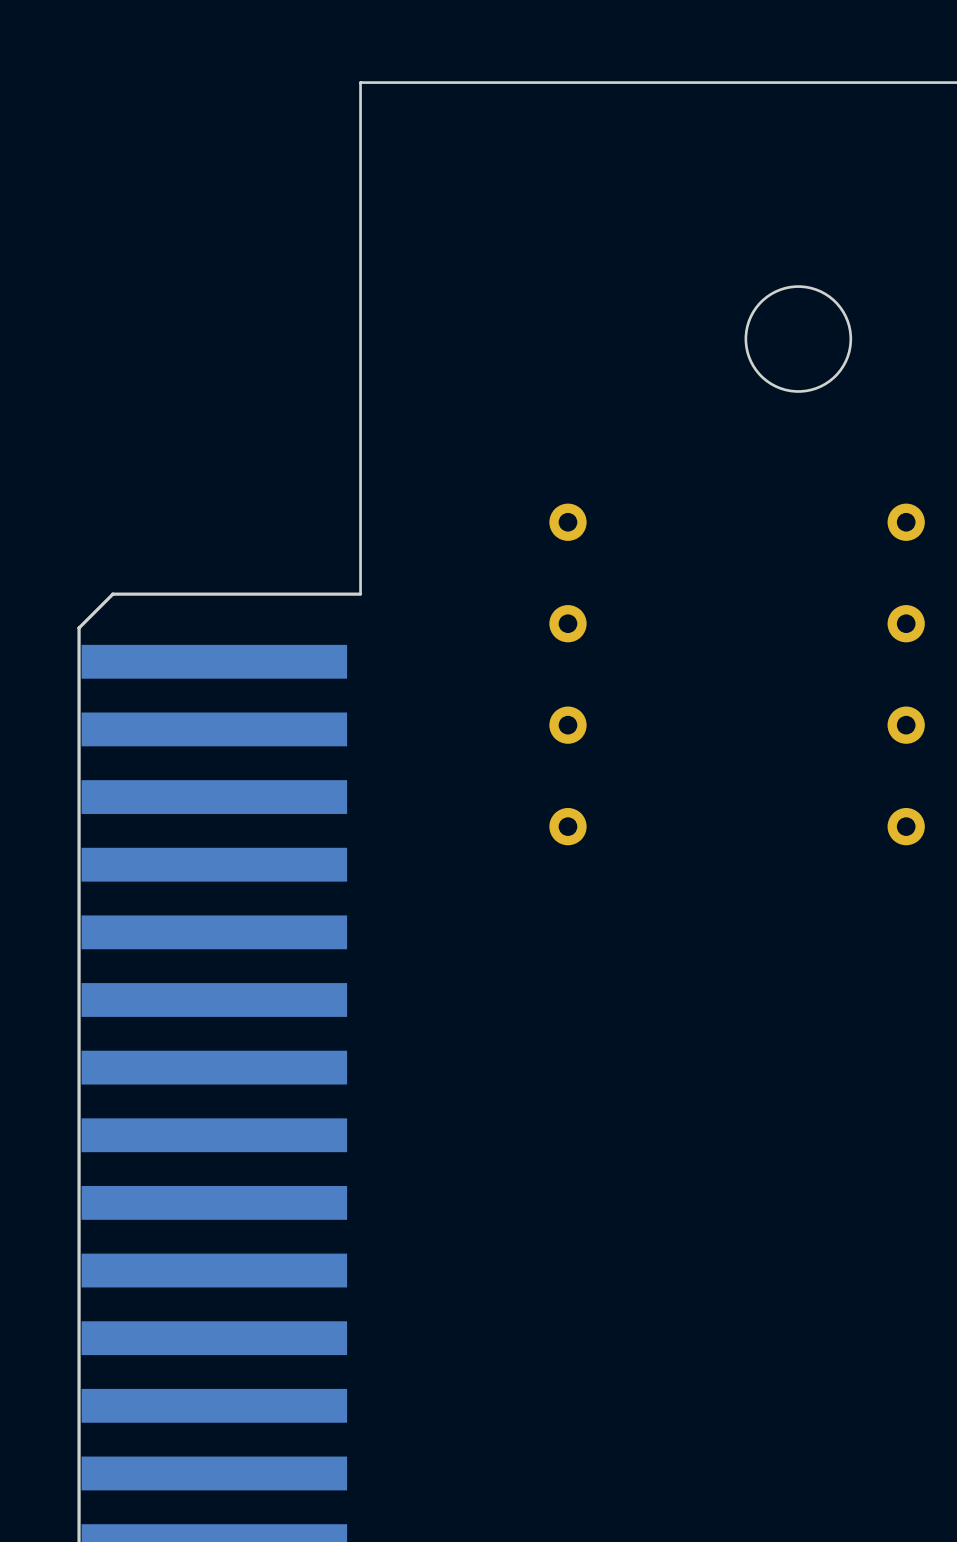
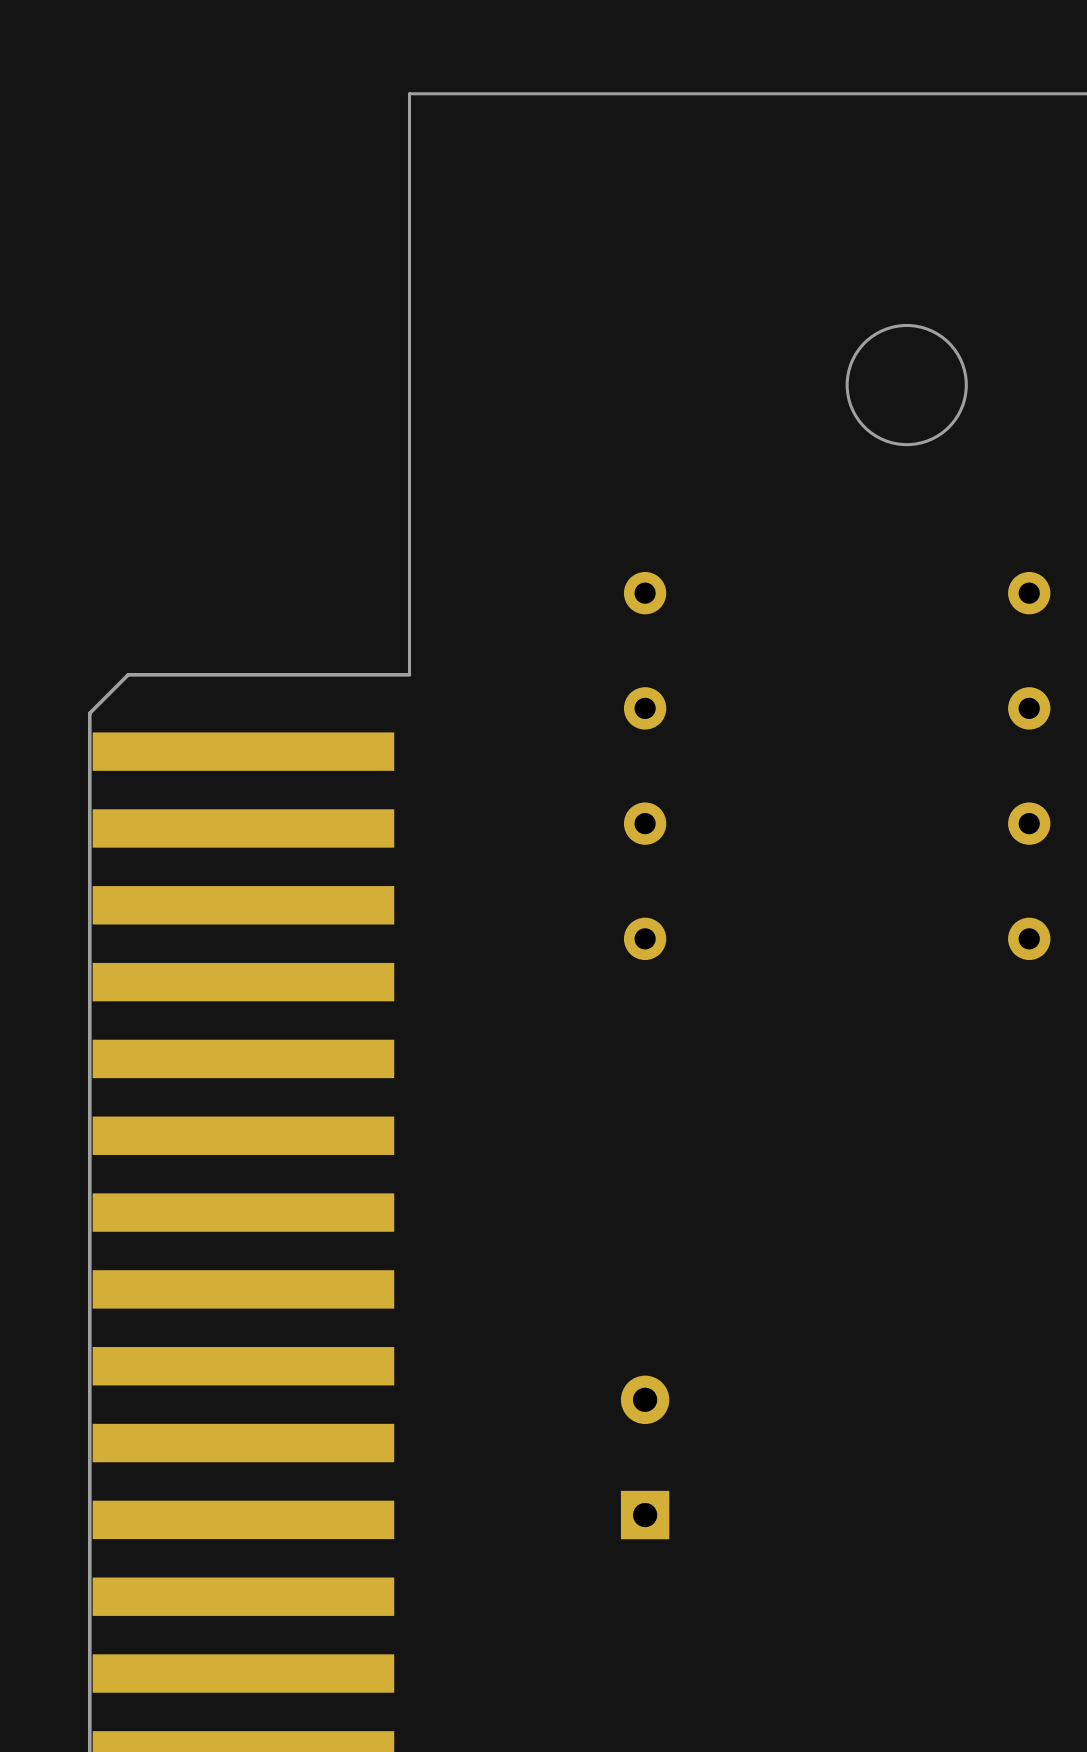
part: none -> (645, 1457)

